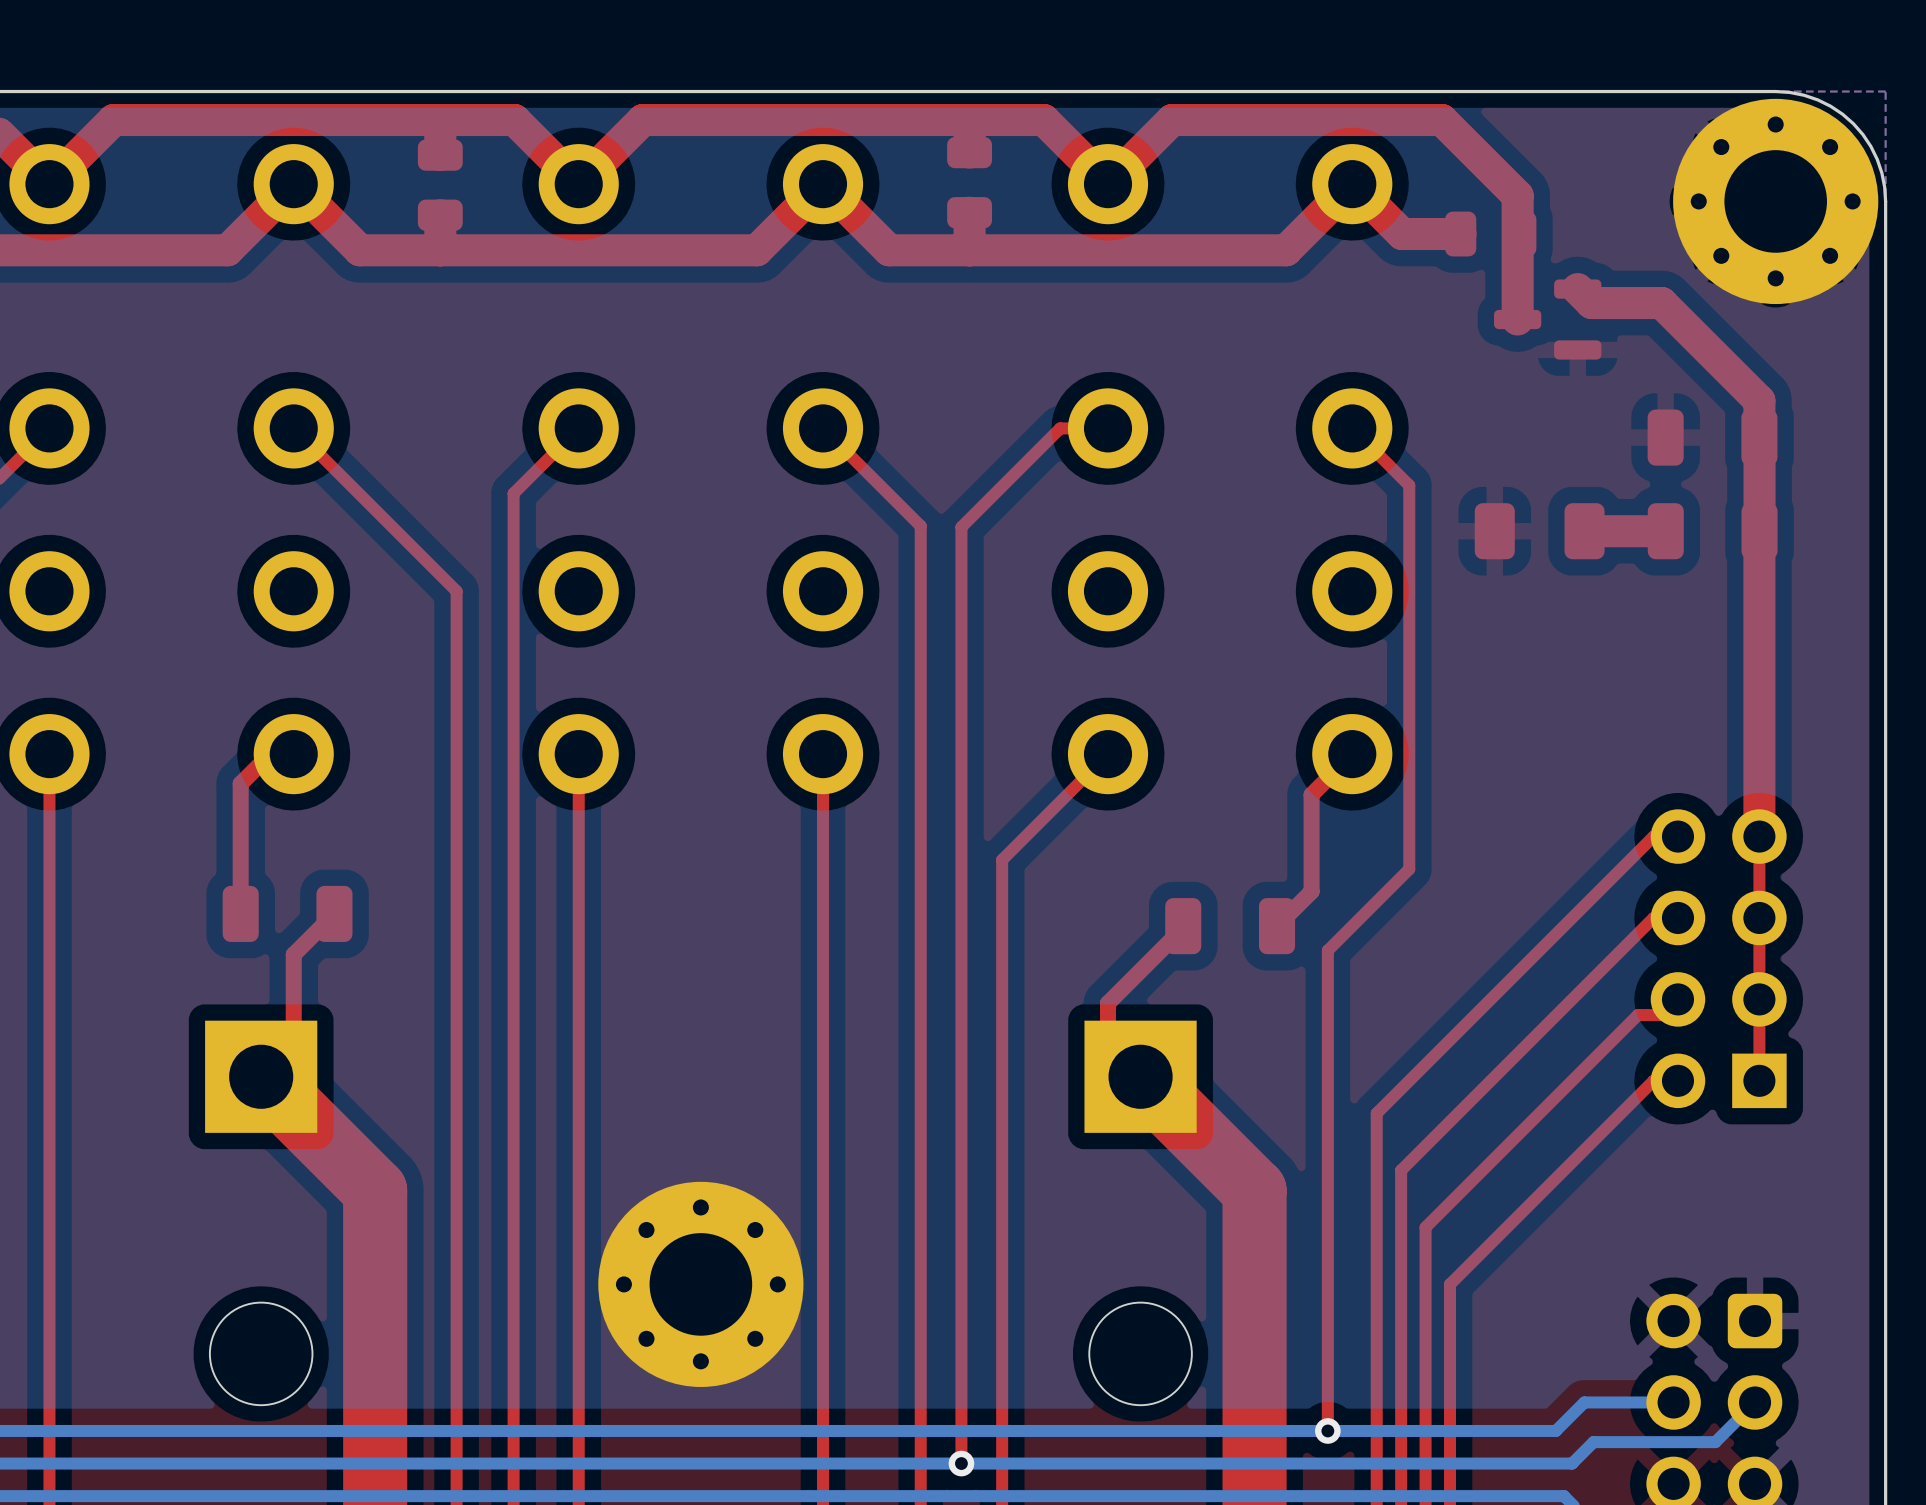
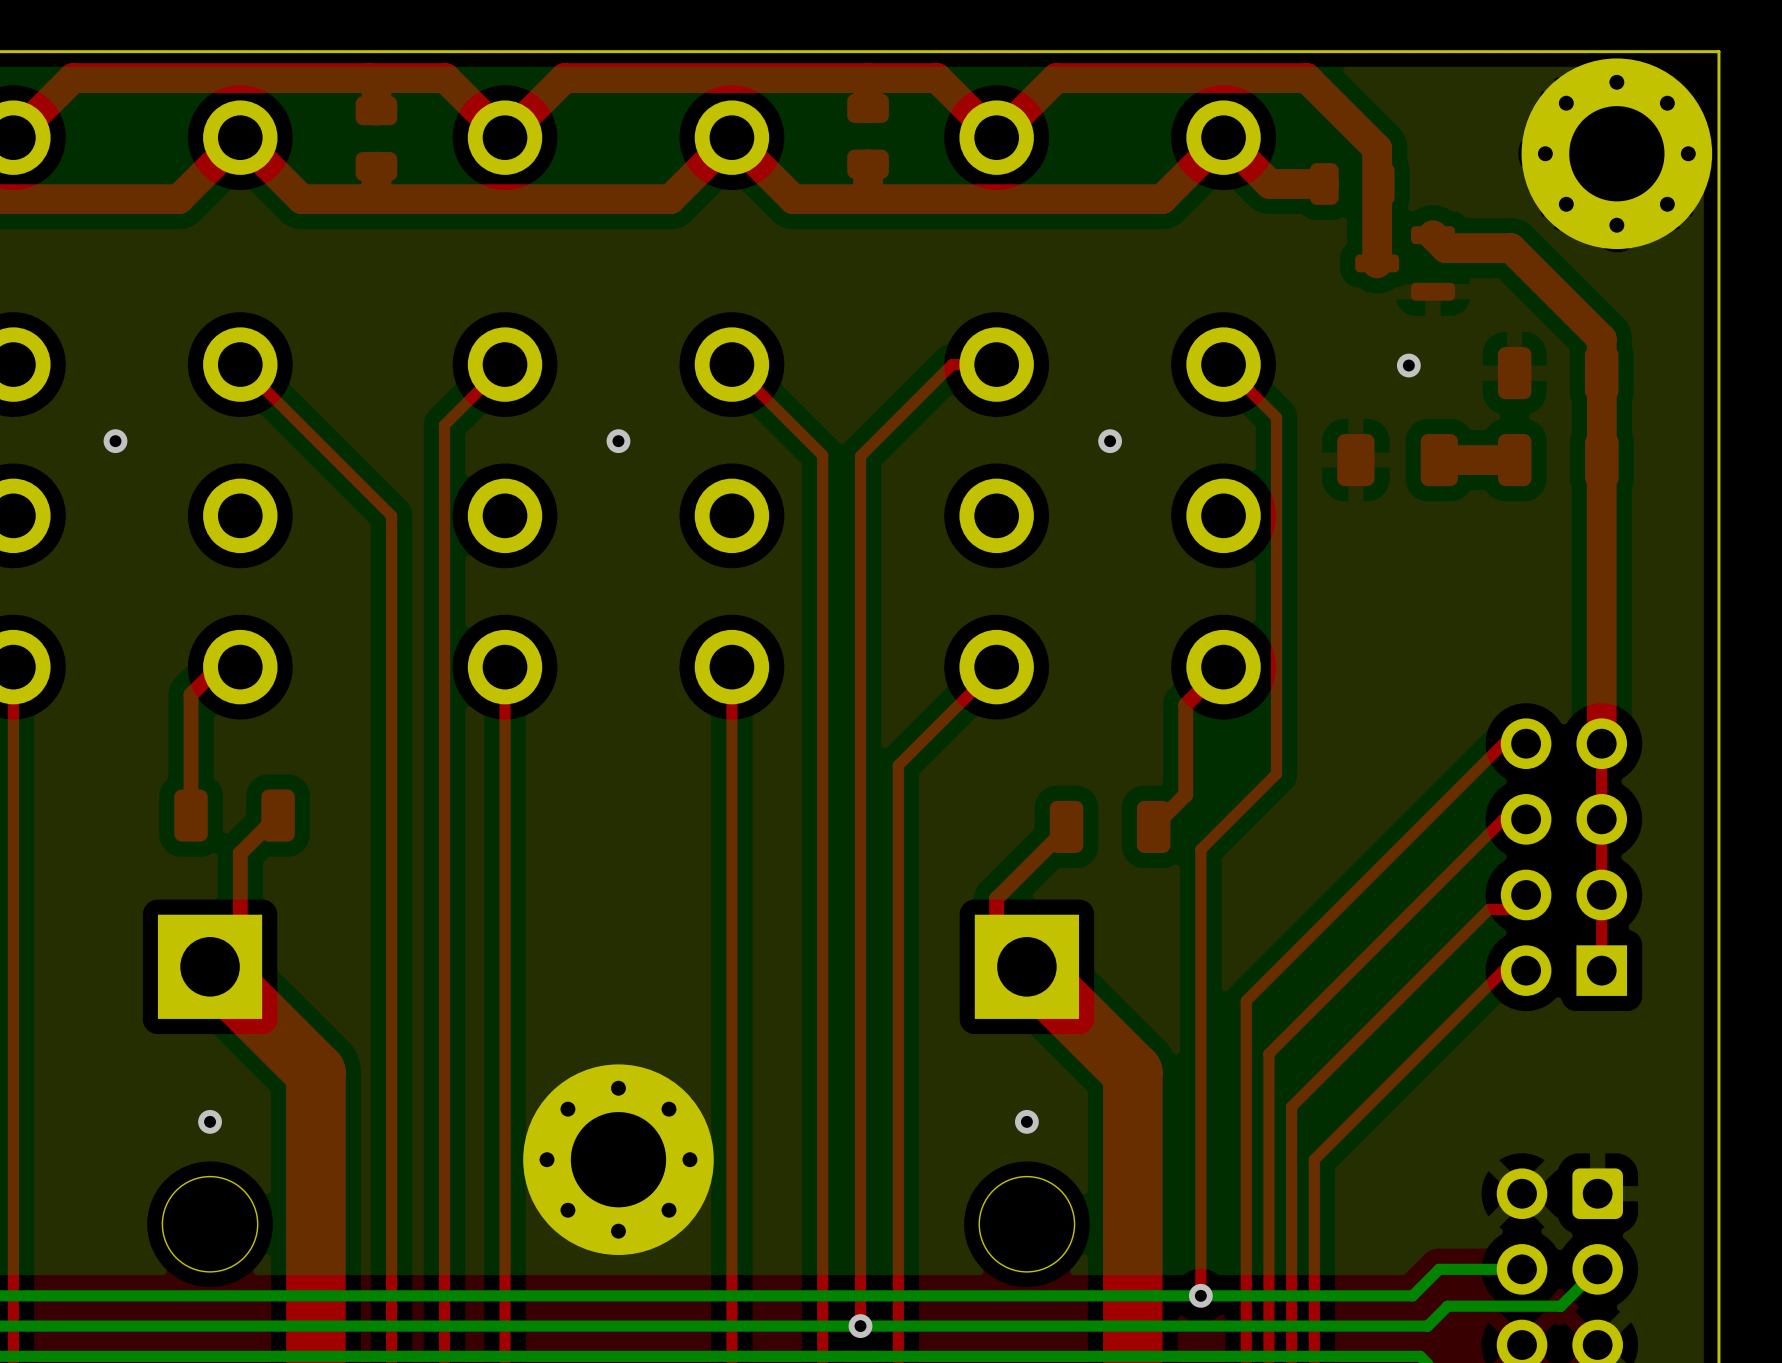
board edge: (1775, 91) (1790, 92) (1817, 99) (1842, 114) (1853, 123) (1862, 134) (1877, 159) (1884, 187) (1885, 201) -> (1616, 51) (1718, 51) (1718, 153)
via: none -> (1408, 365)
via: none -> (115, 441)
via: none -> (618, 441)
via: none -> (1110, 441)
via: none -> (210, 1121)
via: none -> (1026, 1121)

